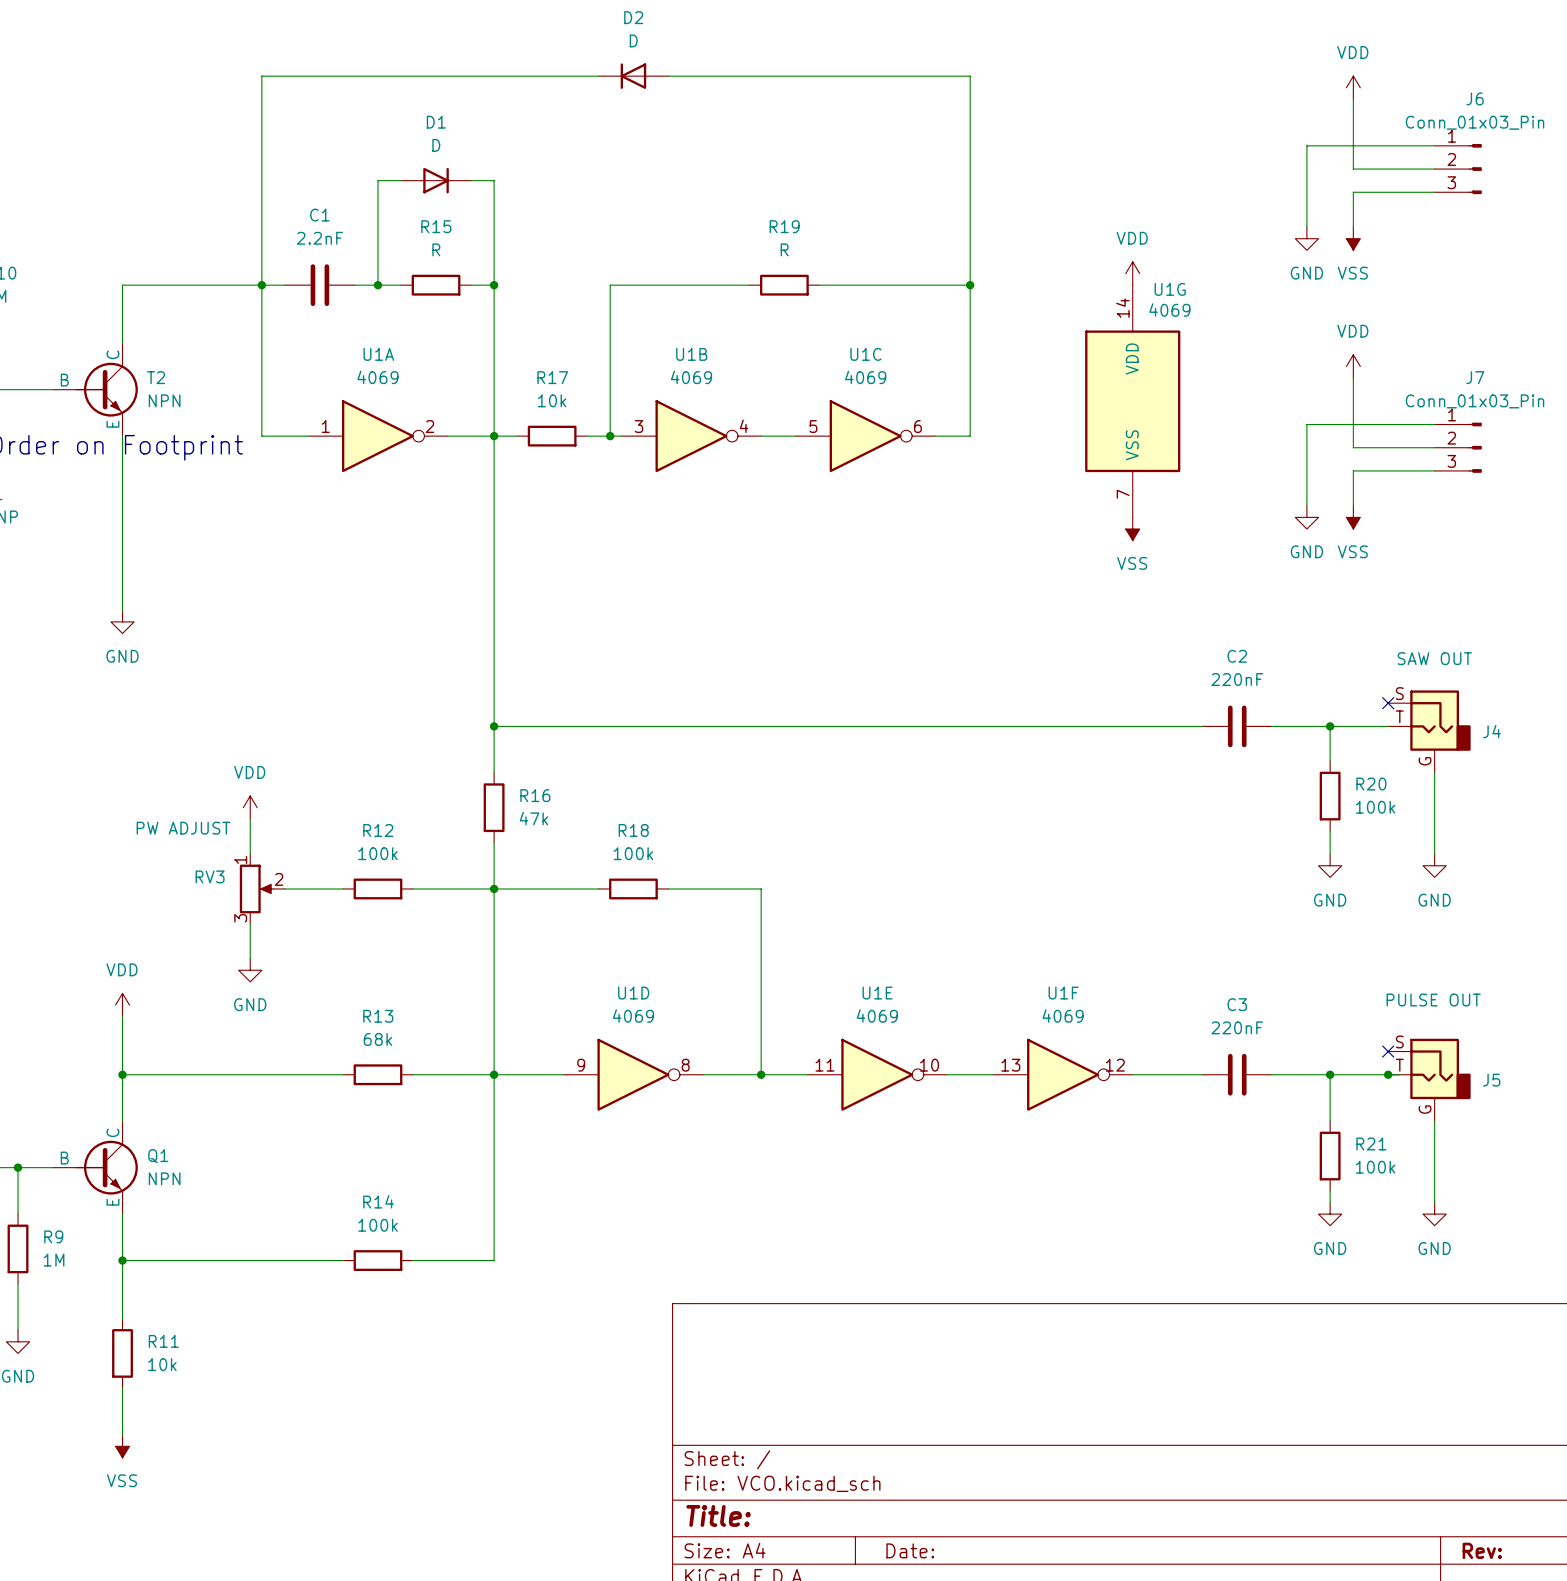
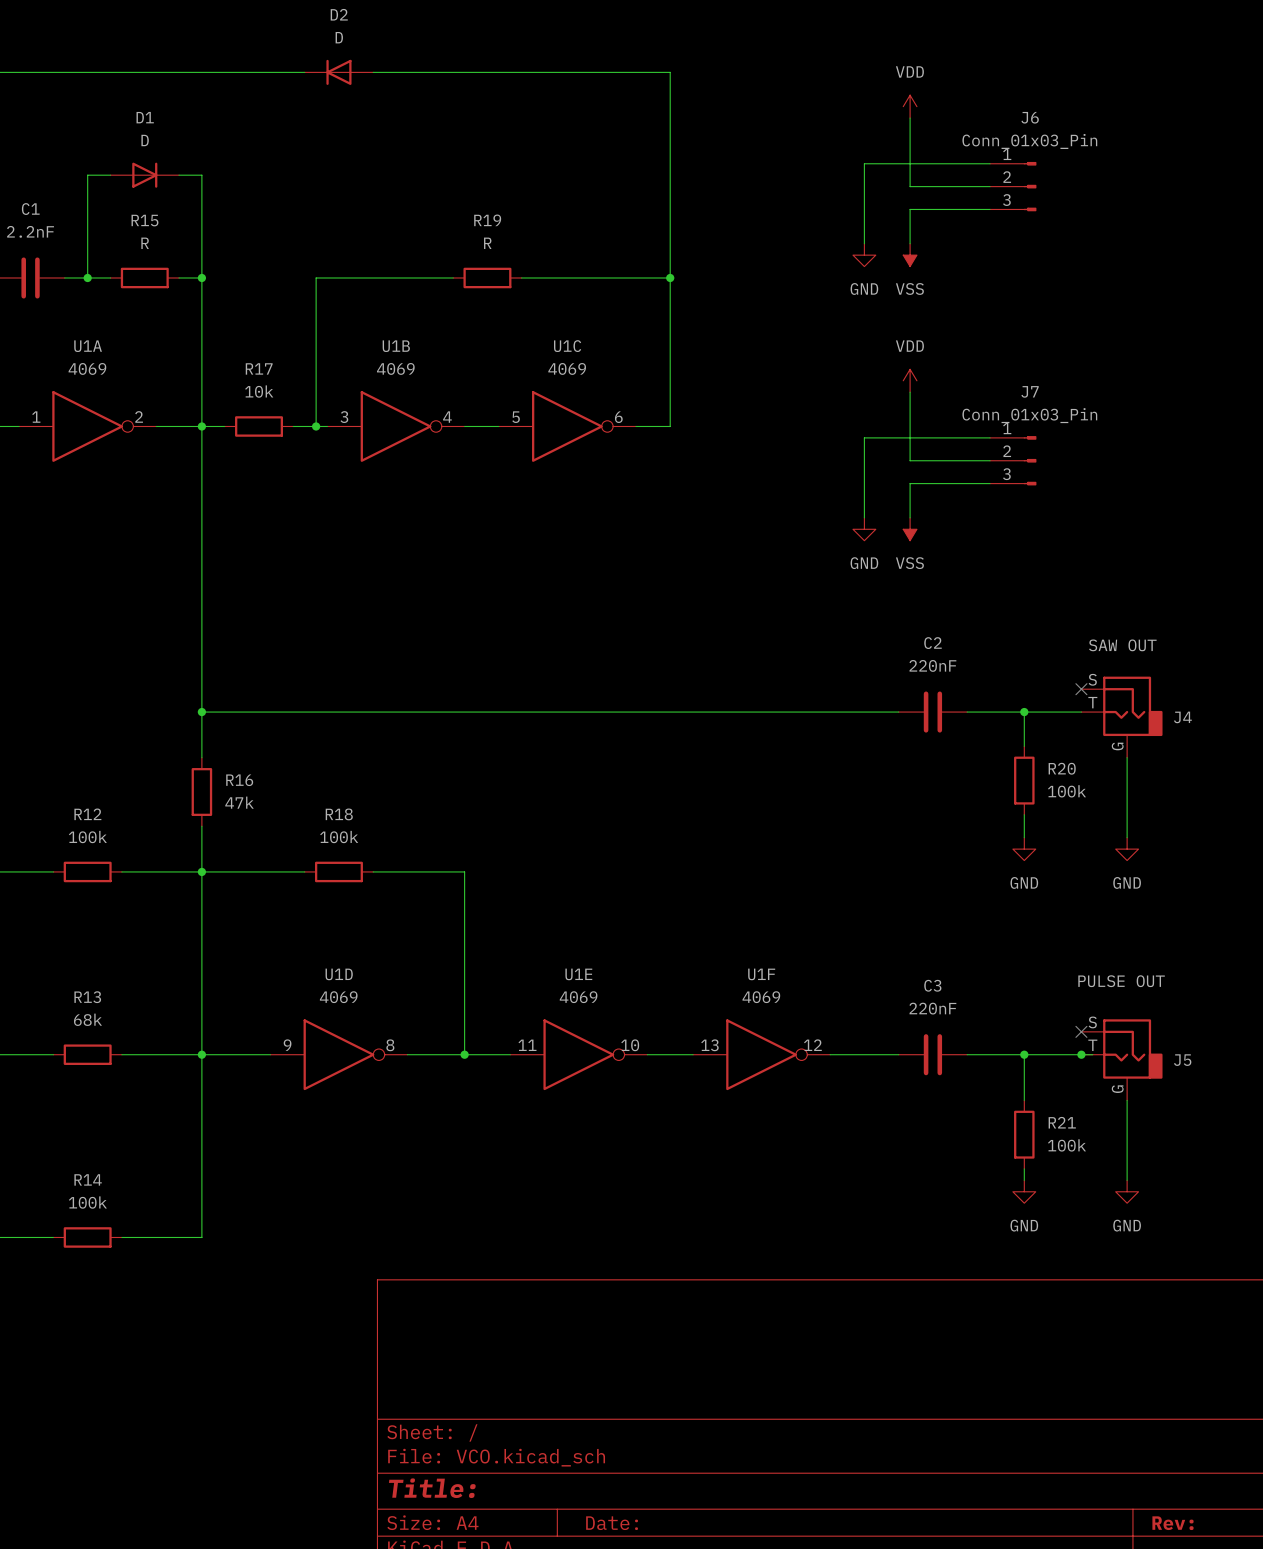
power symbol: VDD (1353, 87) -> none
wire: (1353, 99) (1353, 169) (1434, 169) -> (910, 118) (910, 186) (990, 186)
power symbol: none -> VDD (910, 106)
wire: (1434, 145) (1306, 145) (1306, 227) -> (990, 163) (864, 163) (864, 243)
J6 position: (1458, 169) -> (1013, 186)
wire: (1434, 192) (1353, 192) (1353, 227) -> (990, 209) (910, 209) (910, 243)
power symbol position: GND (1306, 238) -> GND (864, 255)
power symbol: VSS (1353, 238) -> none
power symbol: none -> VSS (910, 255)
power symbol: VDD (1132, 273) -> none
power symbol: VDD (1353, 366) -> none
wire: (1353, 378) (1353, 447) (1434, 447) -> (910, 392) (910, 460) (990, 460)
power symbol: none -> VDD (910, 380)
U1G: 4069 (1132, 401) -> none
wire: (1434, 424) (1306, 424) (1306, 505) -> (990, 437) (864, 437) (864, 517)
J7 position: (1458, 447) -> (1013, 460)
wire: (1434, 470) (1353, 470) (1353, 505) -> (990, 483) (910, 483) (910, 517)
power symbol position: GND (1306, 517) -> GND (864, 529)
power symbol: VSS (1353, 517) -> none
power symbol: VSS (1132, 529) -> none
power symbol: none -> VSS (910, 529)

